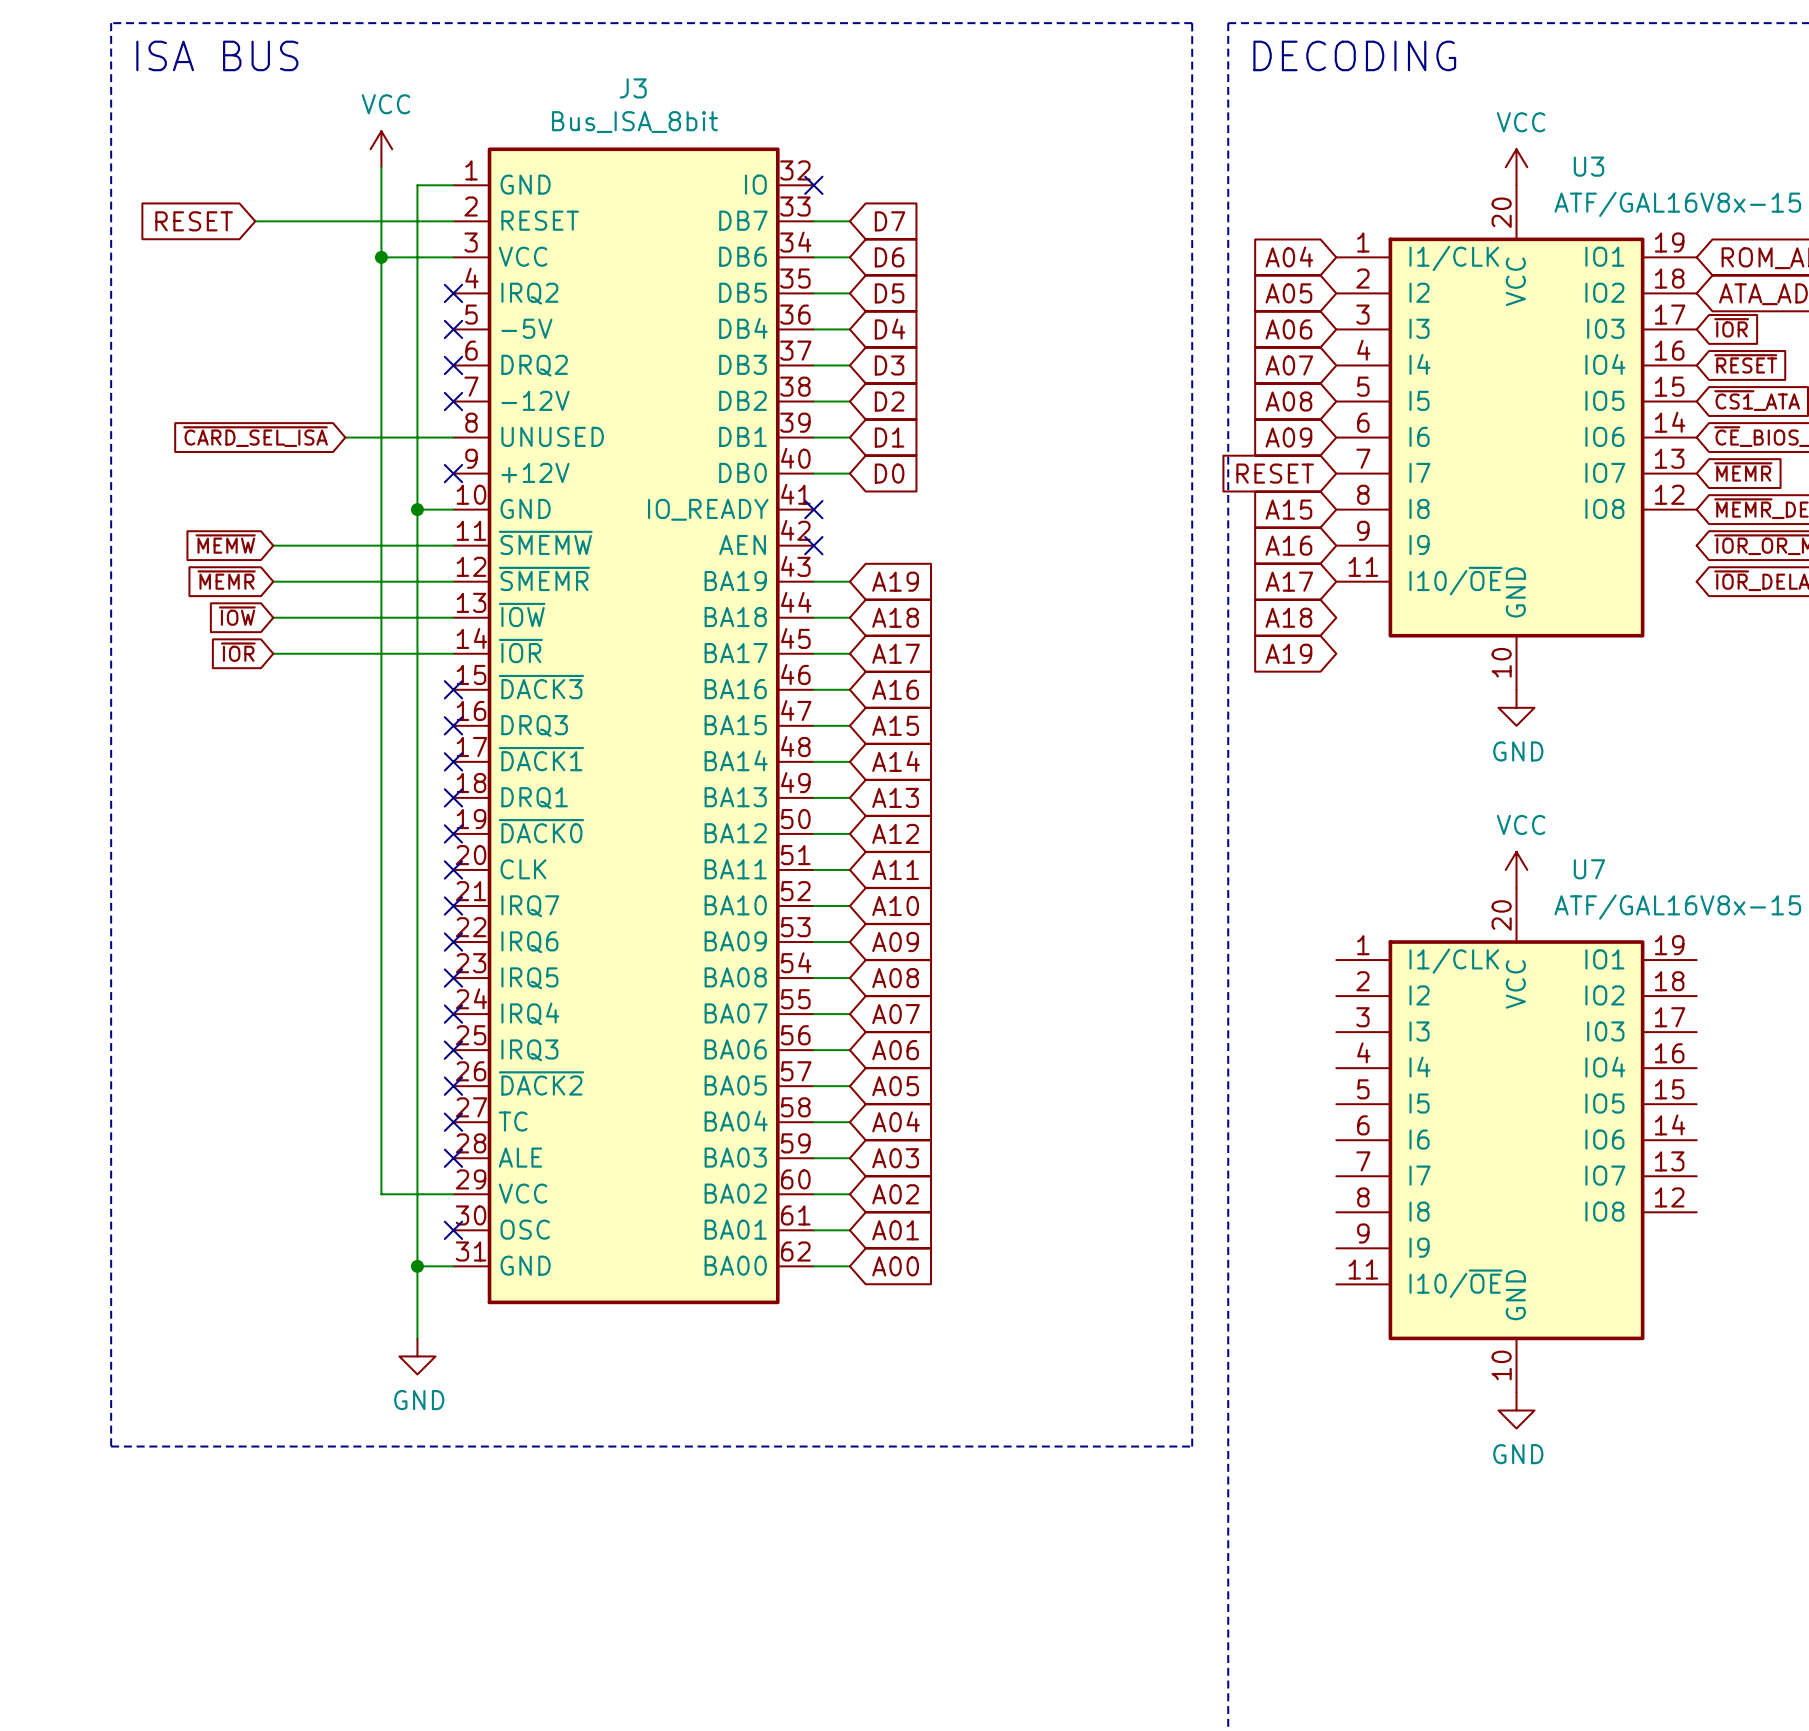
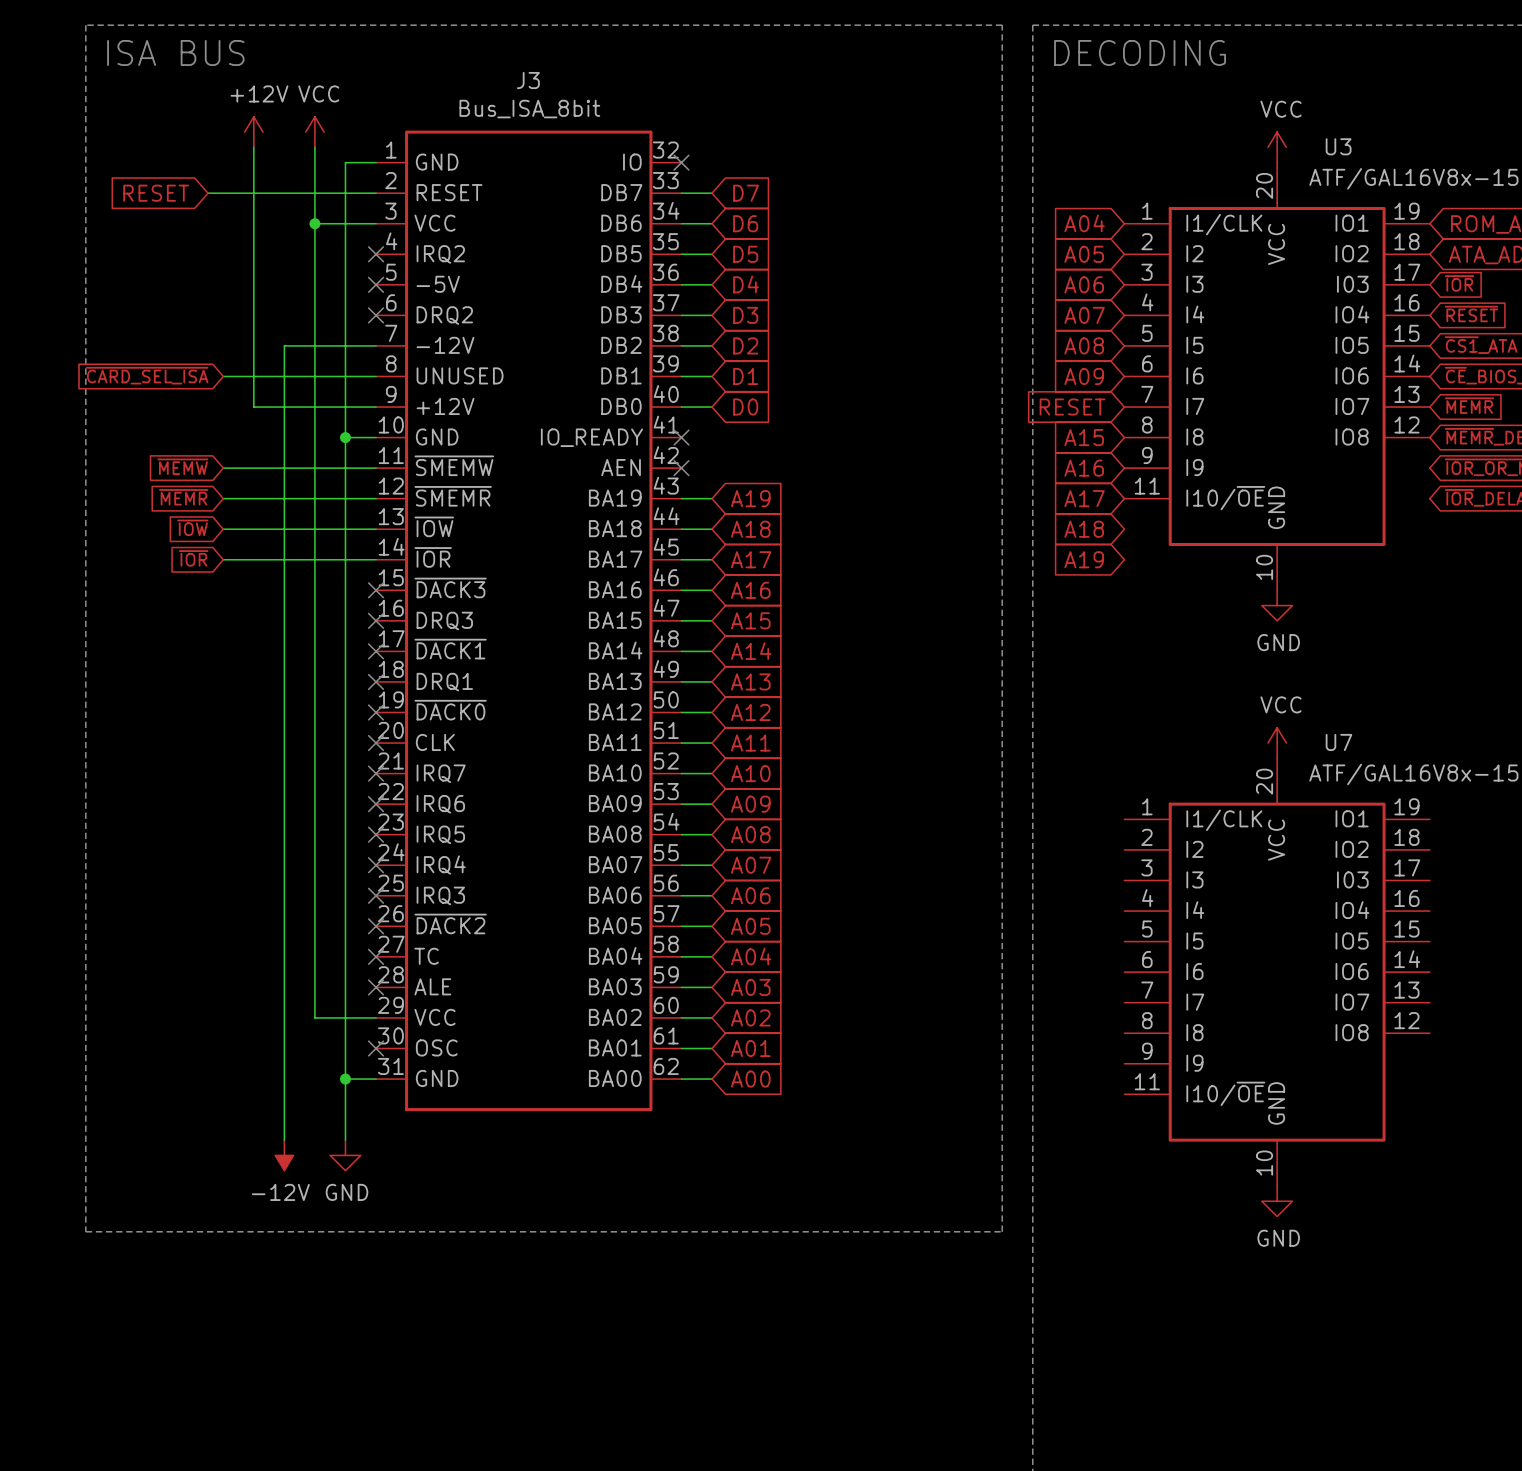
power symbol: none -> +12V (253, 132)
wire: none -> (253, 147) (253, 407) (376, 407)
wire: none -> (376, 345) (284, 345) (284, 1140)
no-connect mark: (453, 401) -> none
global label position: ~{CARD_SEL_ISA} (255, 436) -> ~{CARD_SEL_ISA} (147, 375)
wire: none -> (223, 376) (284, 376)
no-connect mark: (453, 473) -> none
power symbol: none -> -12V (284, 1155)

